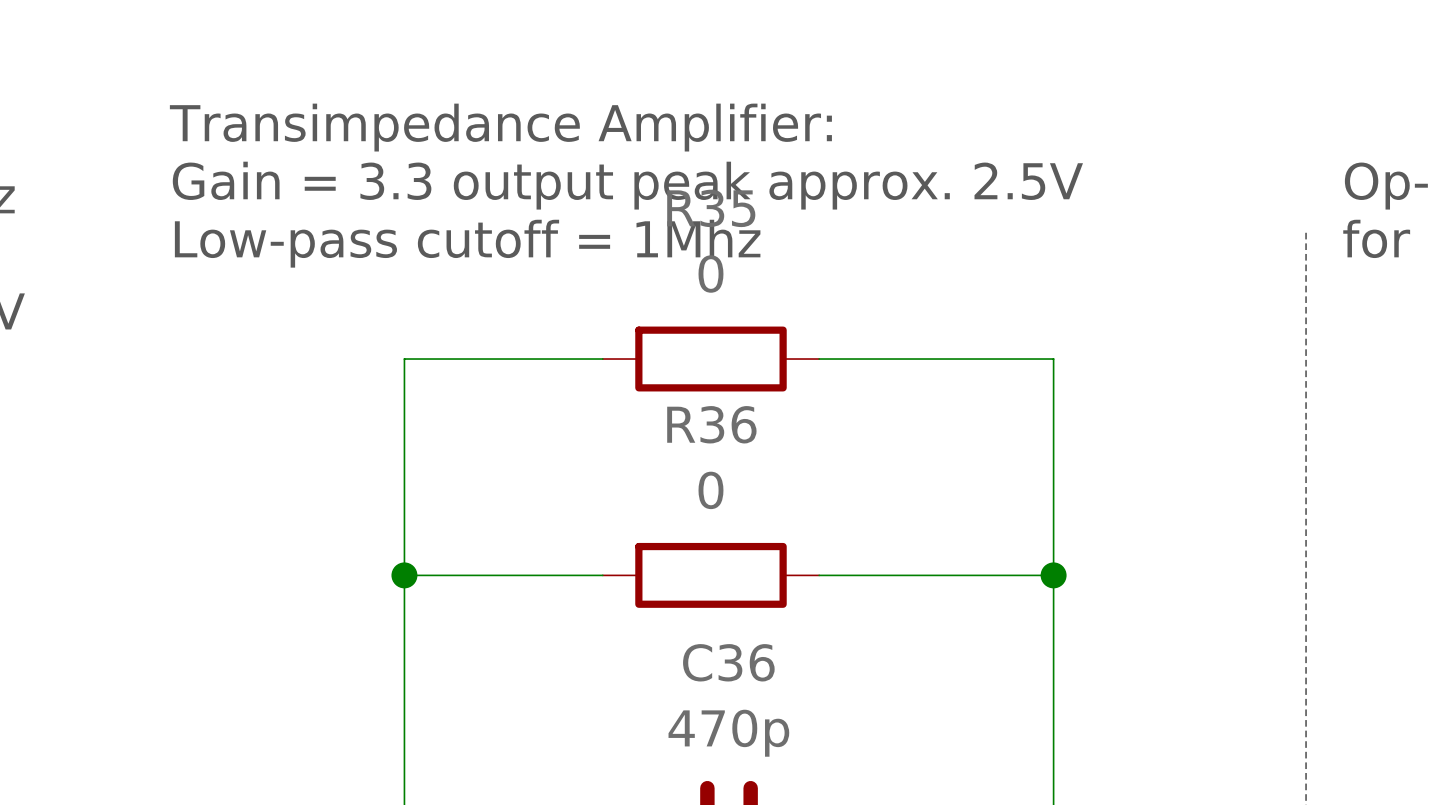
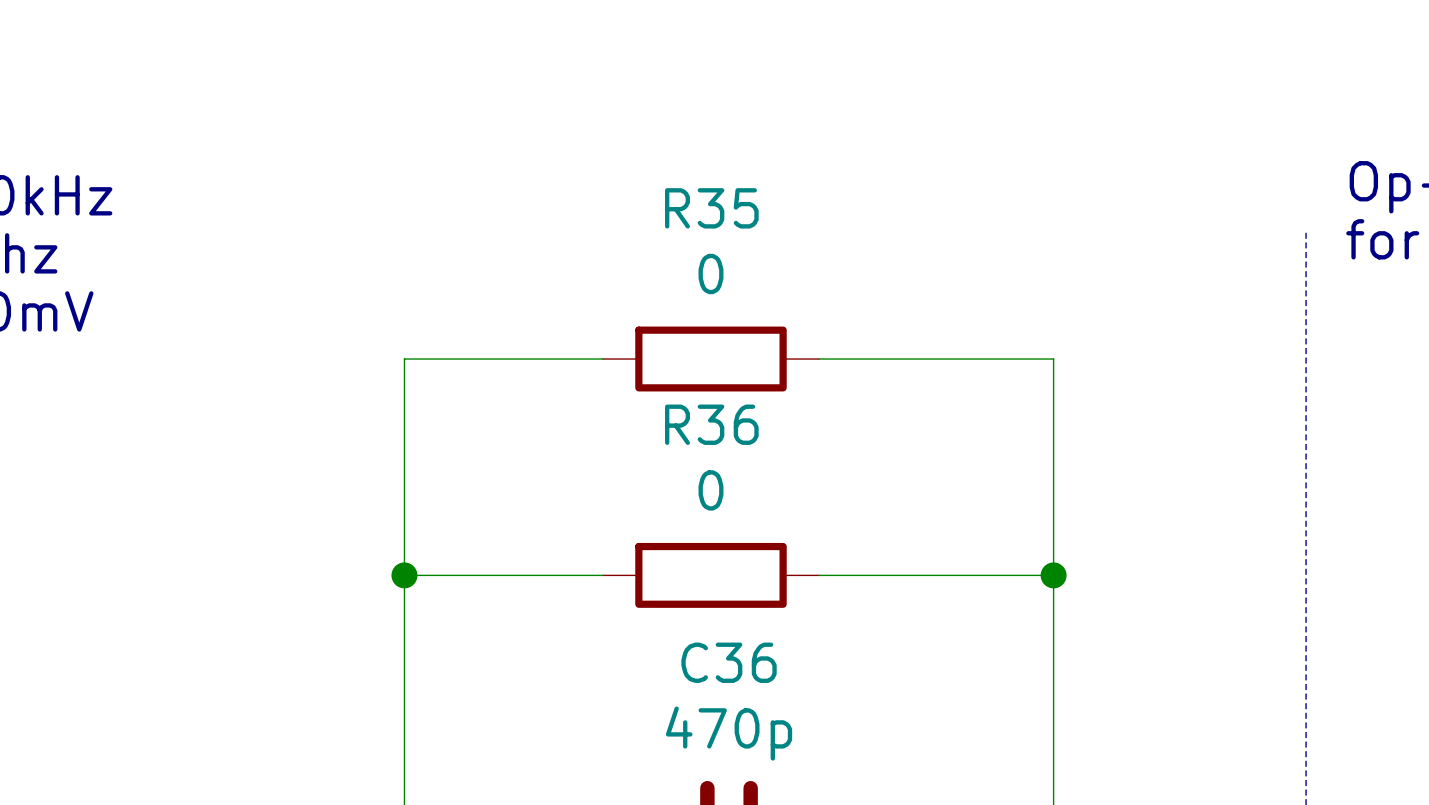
text: Transimpedance Amplifier: (500, 127) -> none
text: Gain = 3.3 output peak approx. 2.5V (627, 185) -> none
text: Low-pass cutoff = 1Mhz (467, 243) -> none

